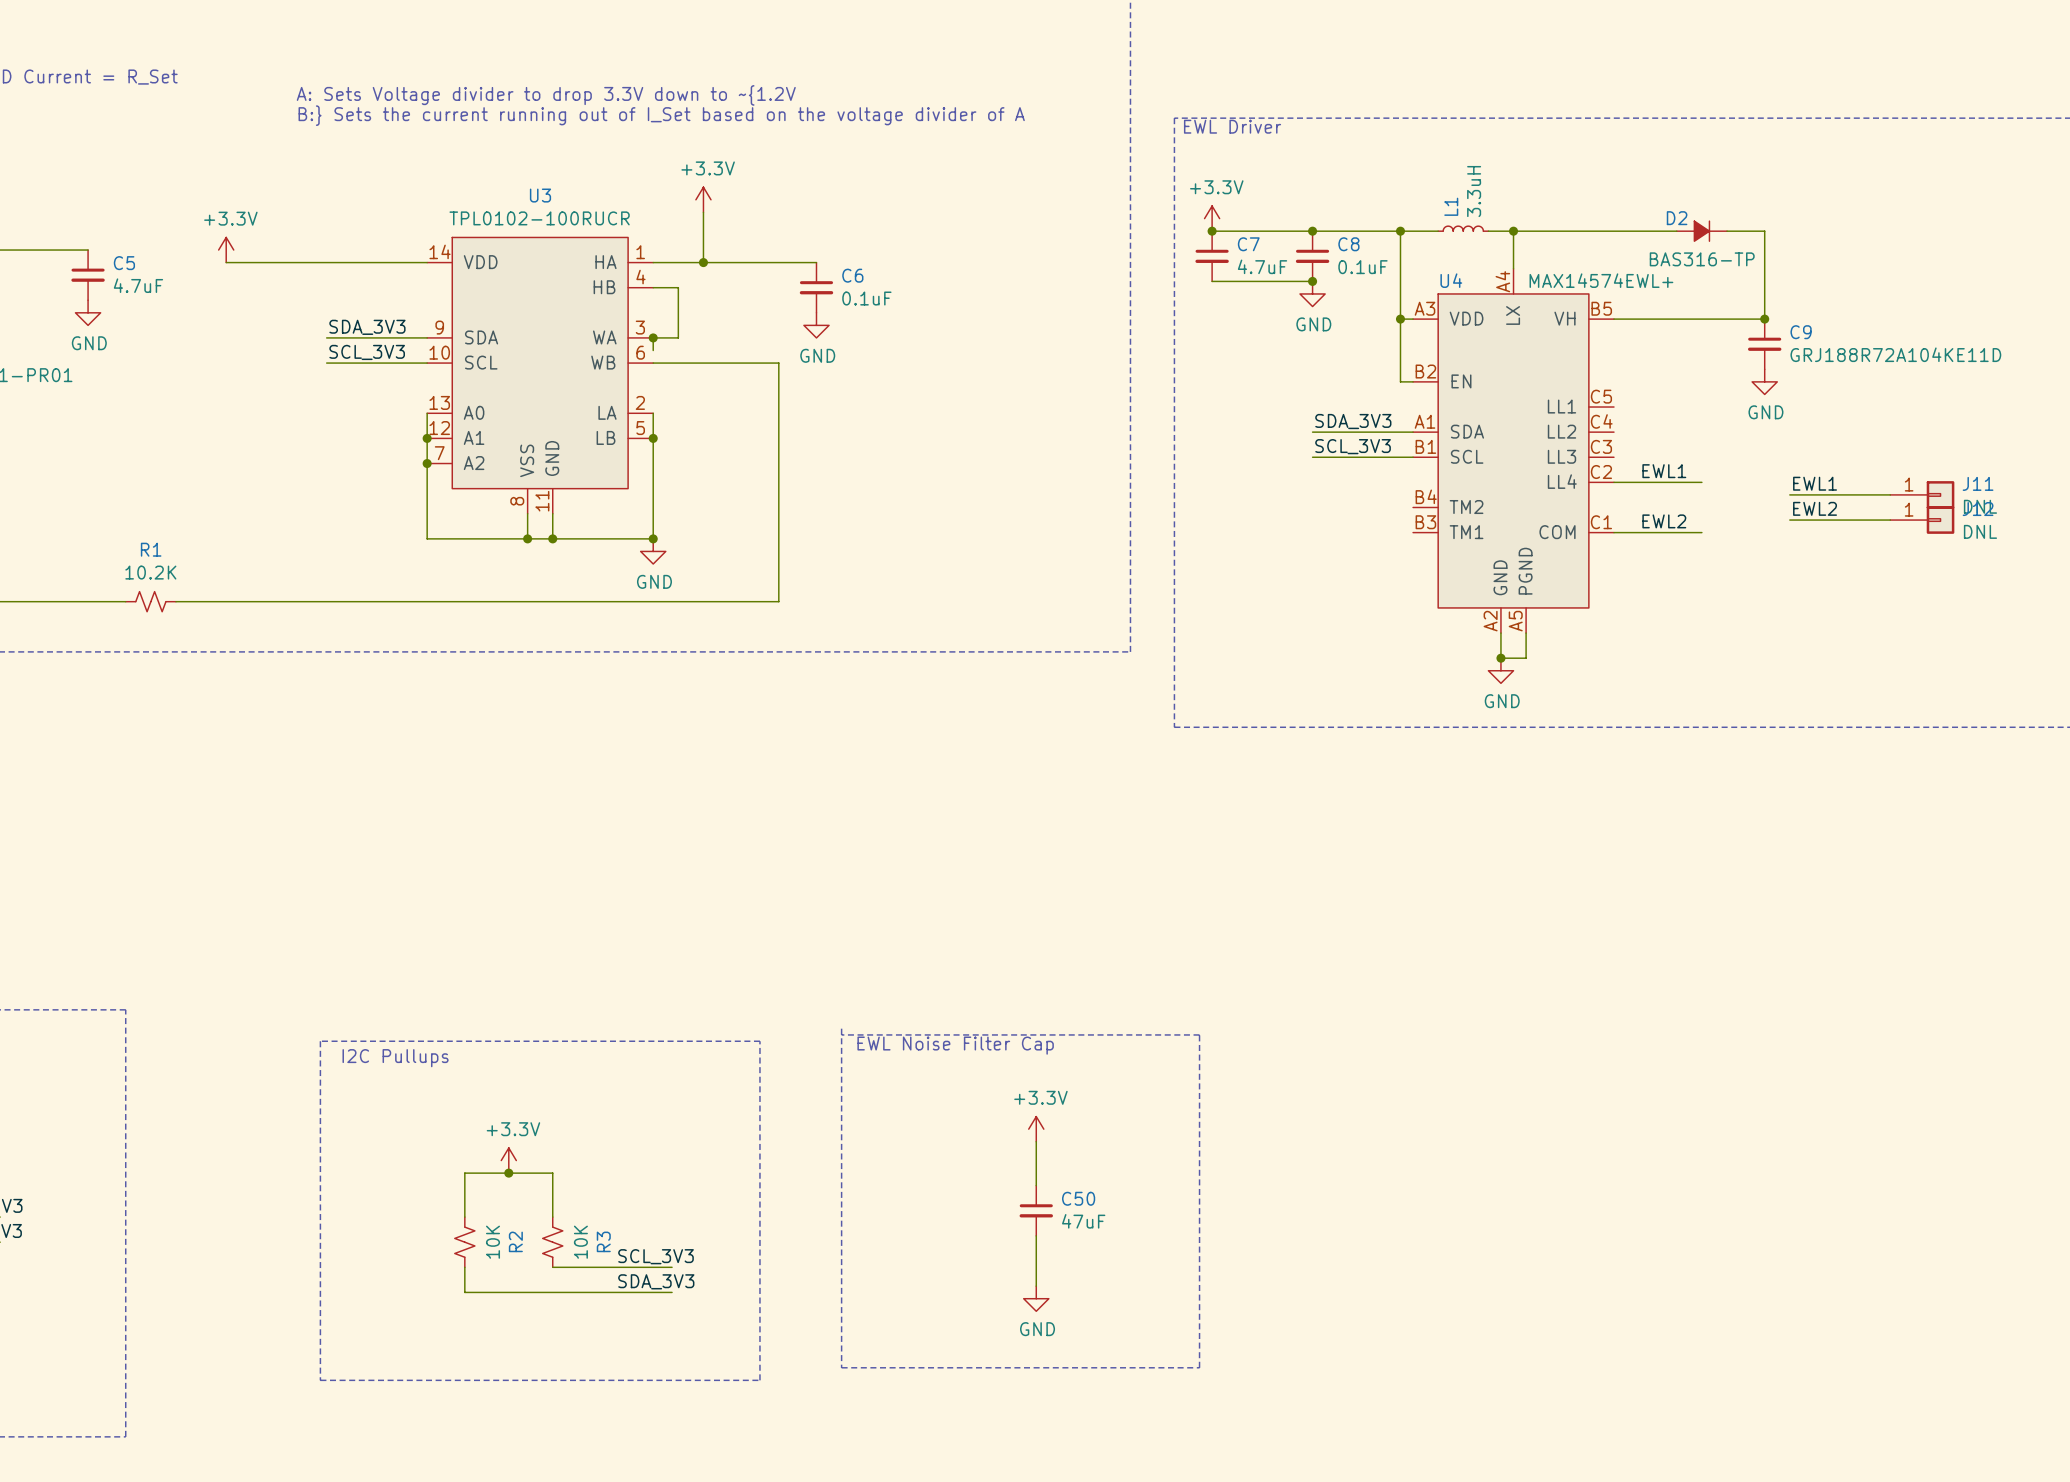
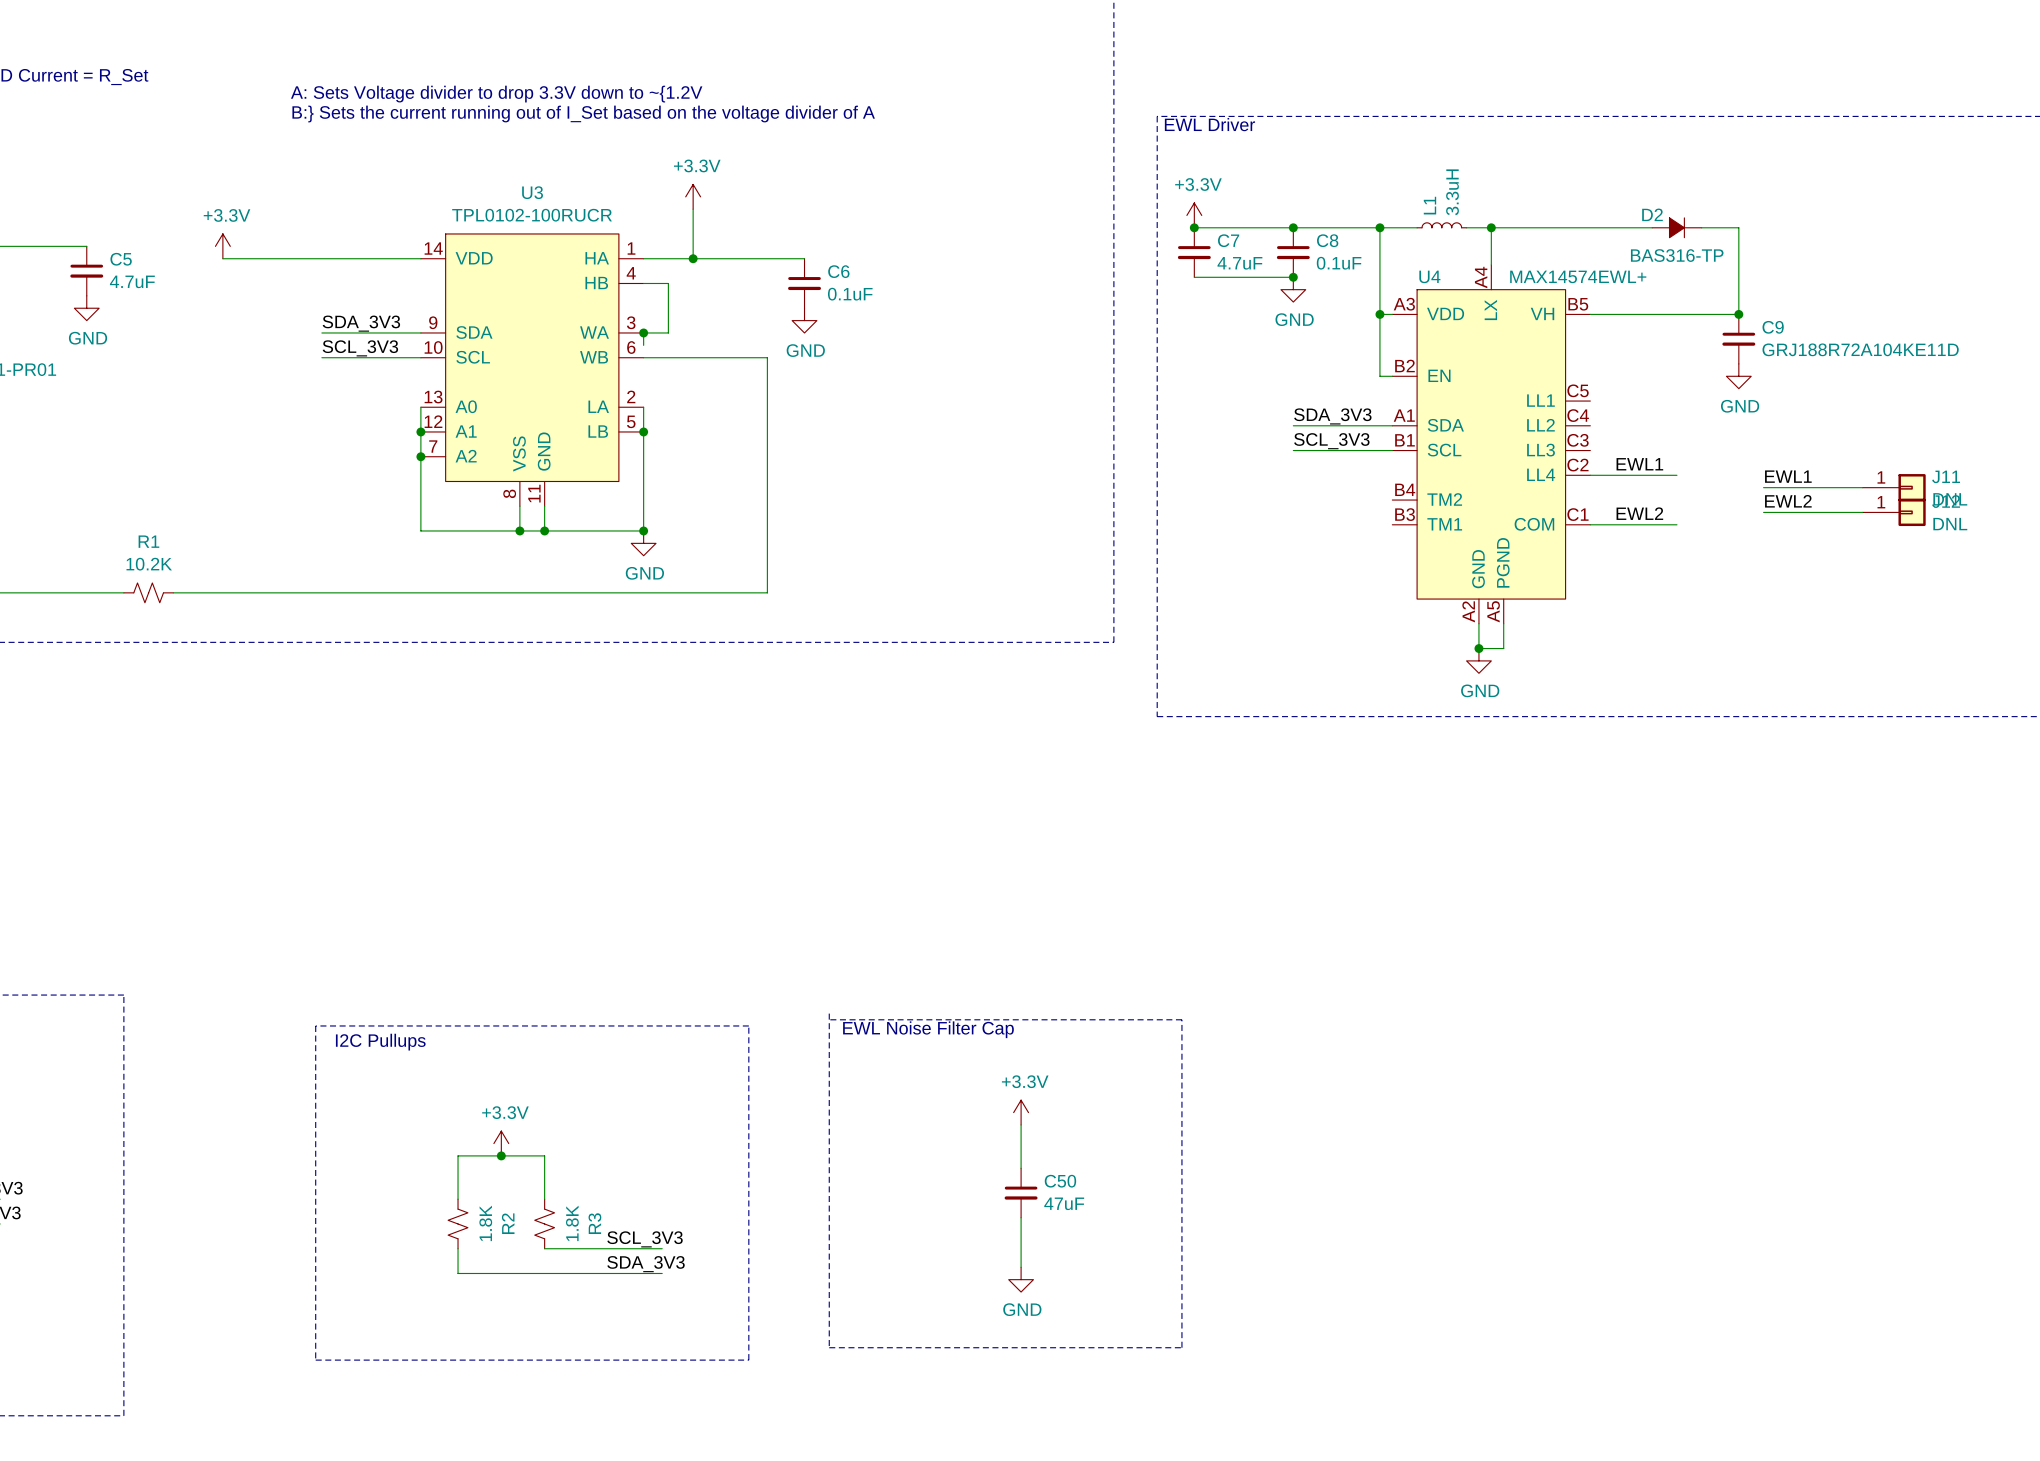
R2 text: 10K (492, 1242) -> 1.8K (485, 1223)
R3 text: 10K (580, 1242) -> 1.8K (572, 1223)

